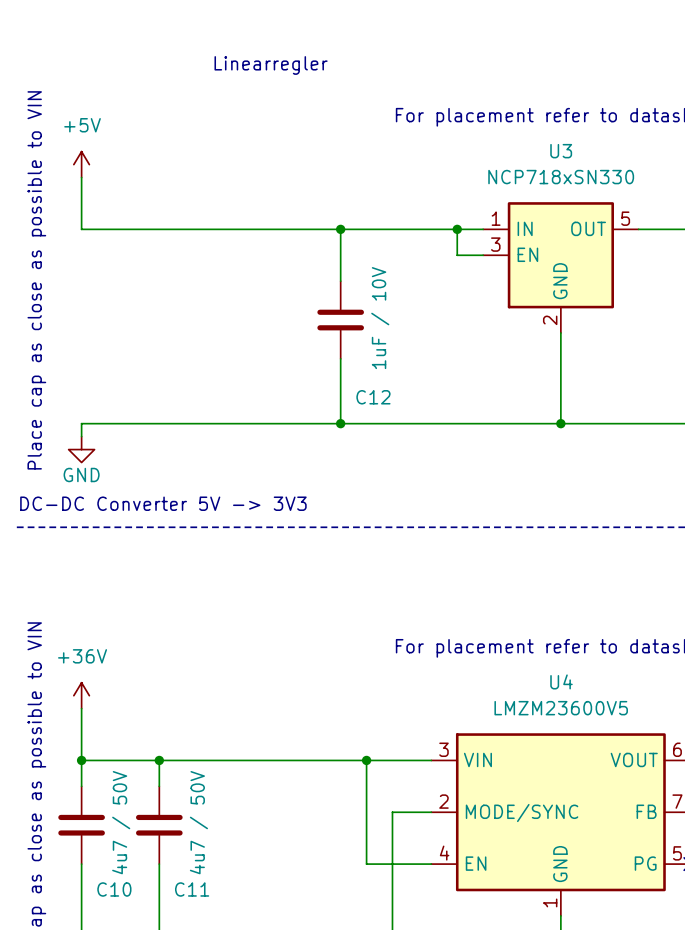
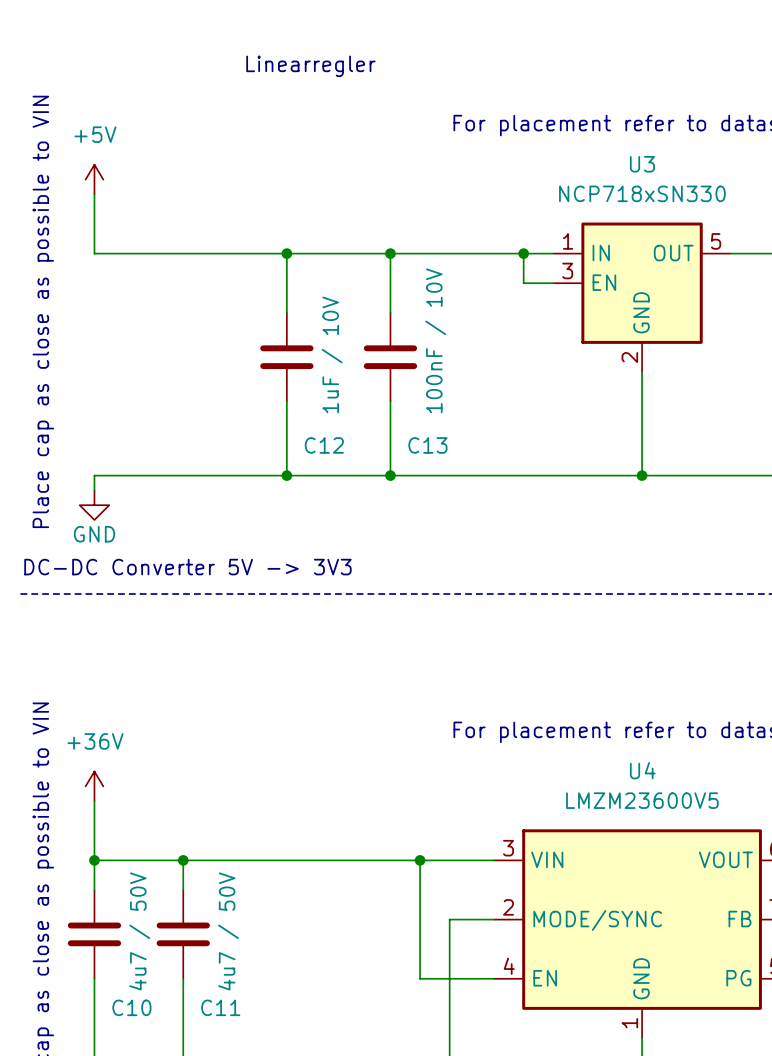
wire: none -> (286, 253) (286, 312)
junction: none -> (286, 253)
C12 value: 1uF / 10V (380, 318) -> 100nF / 10V (435, 340)
C12: none -> 1uF / 10V (286, 357)
wire: none -> (286, 401) (286, 475)
C12 name: C12 (373, 397) -> C13 (427, 445)
junction: none -> (286, 475)

